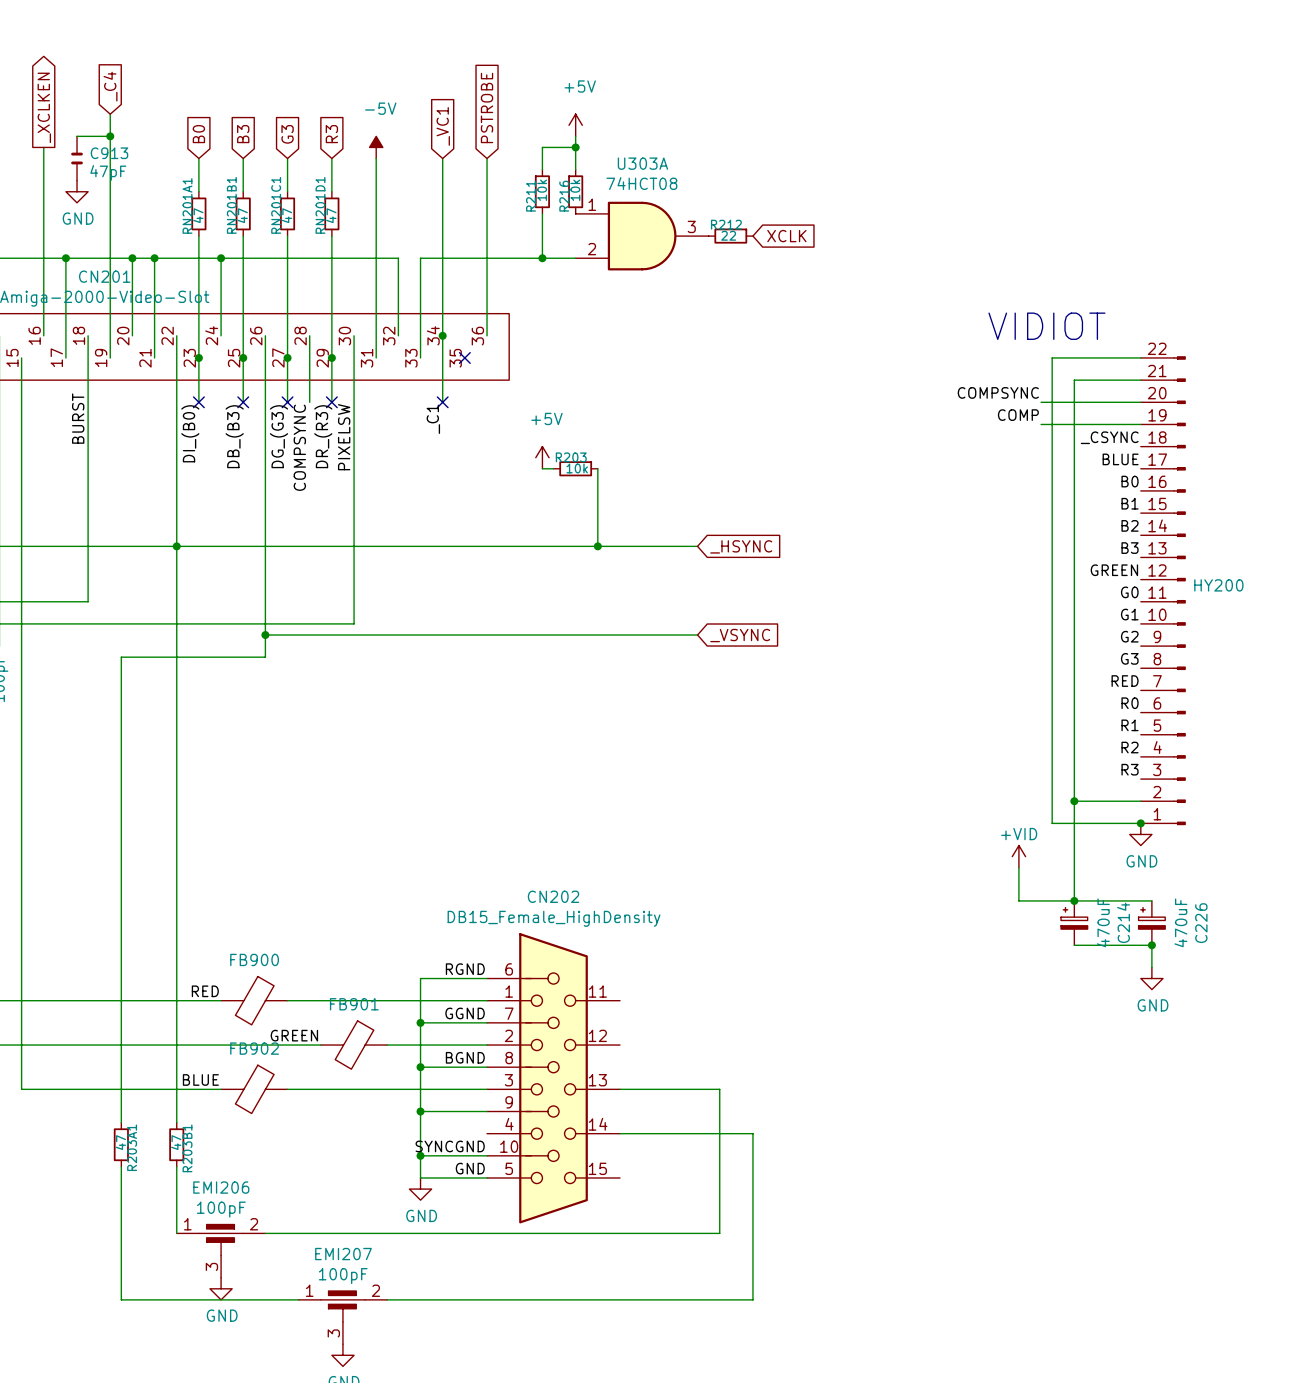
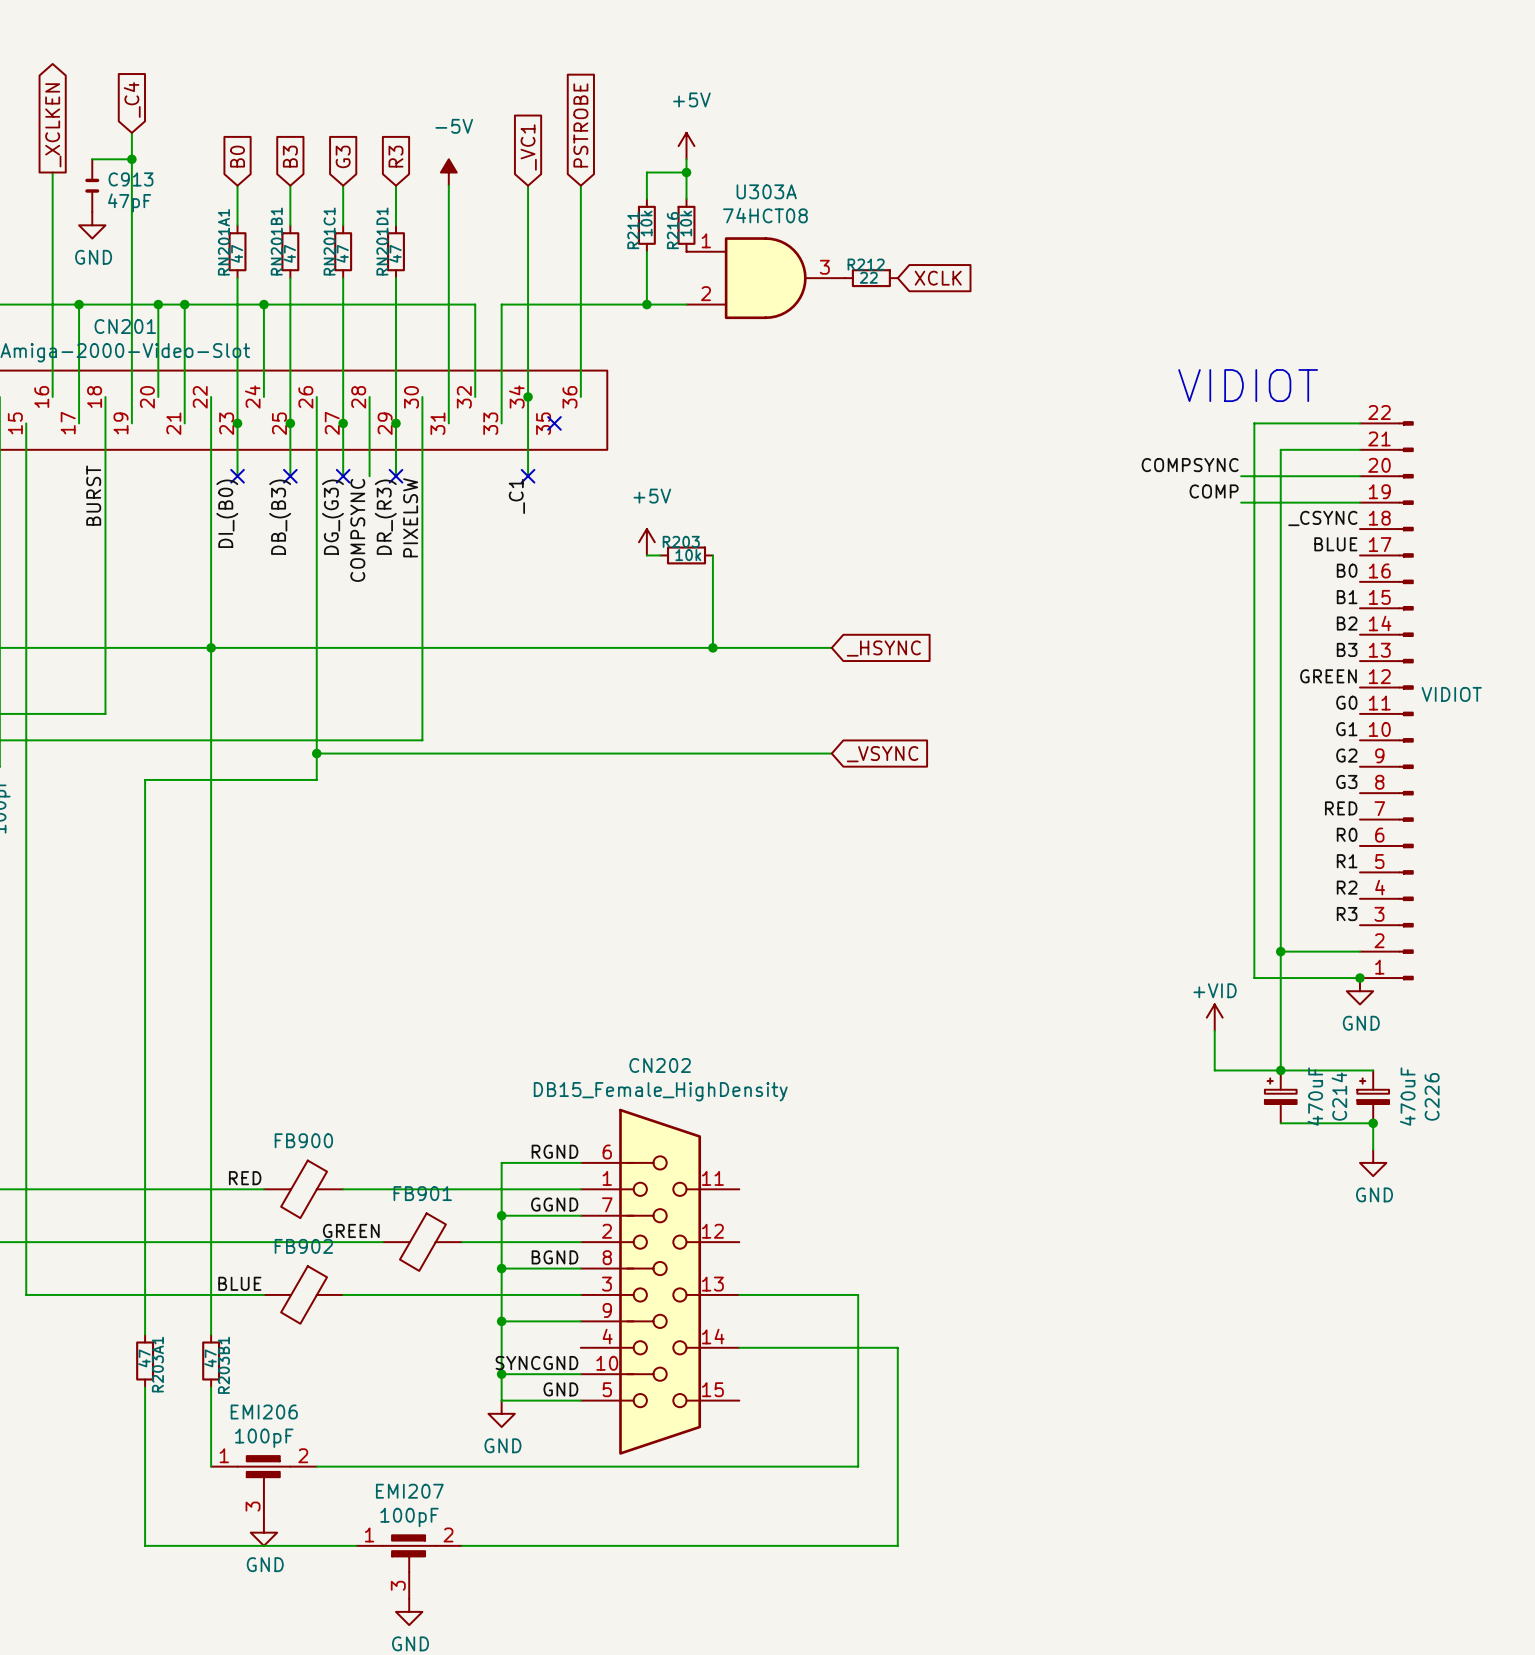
part value: HY200 (1218, 585) -> VIDIOT (1451, 694)

